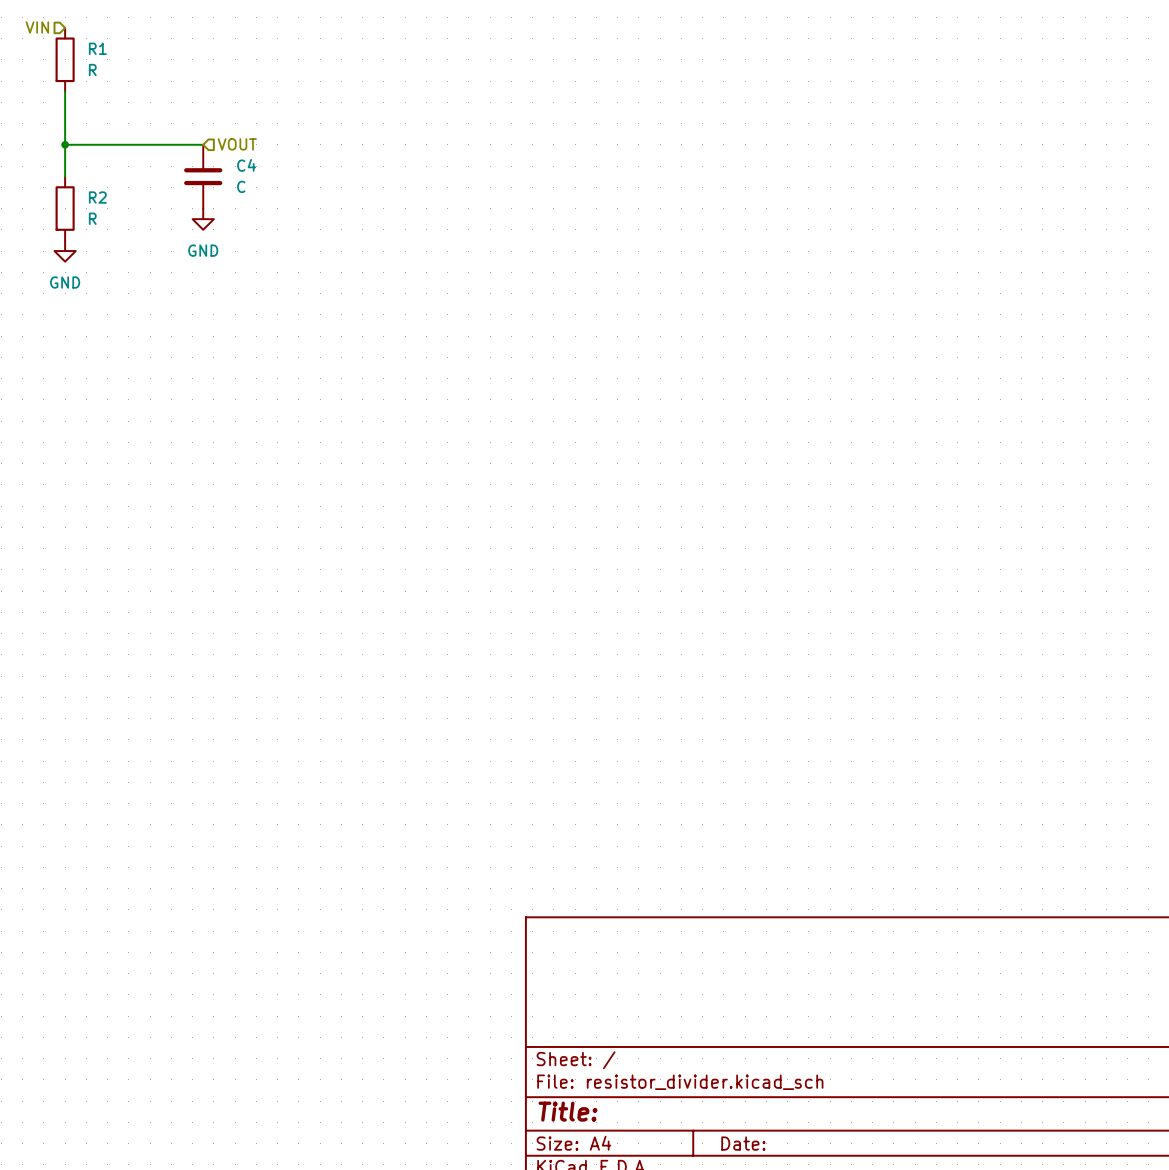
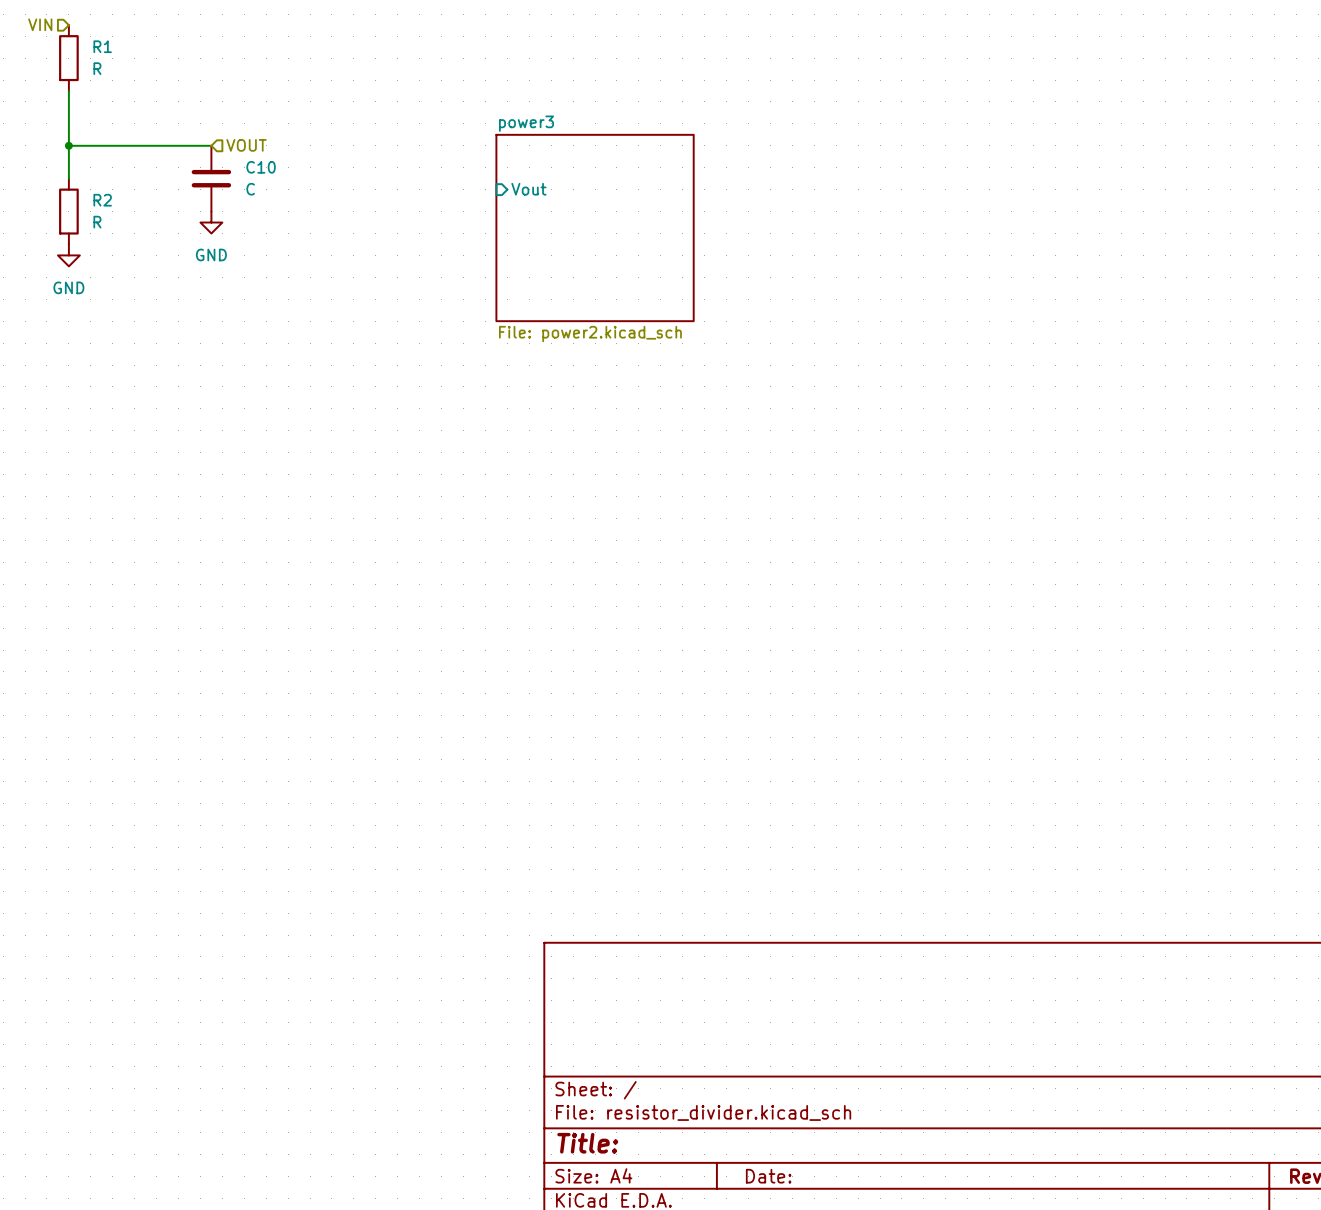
C4 name: C4 (246, 165) -> C10 (261, 167)
sheet pin: none -> Vout (528, 189)
sheet power3: none -> File: power2.kicad_sch (595, 228)

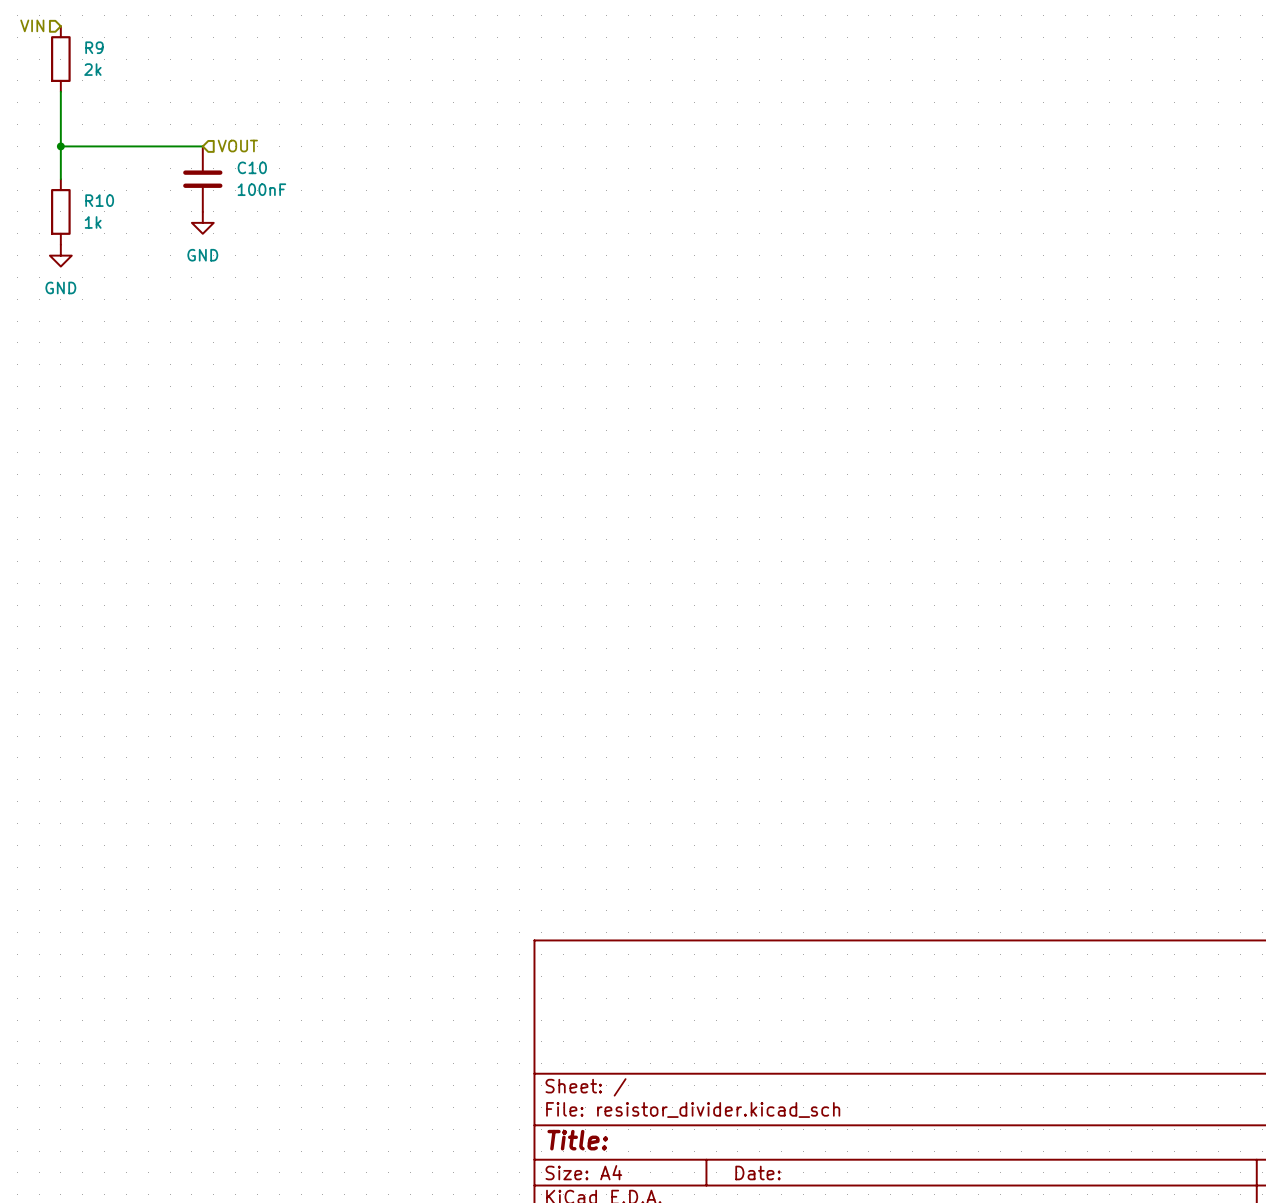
R1 name: R1 (102, 46) -> R9 (94, 47)
R1 value: R (97, 68) -> 2k (92, 69)
C10 value: C (250, 189) -> 100nF (261, 189)
sheet pin: Vout (528, 189) -> none
R2 name: R2 (102, 200) -> R10 (99, 200)
R2 value: R (97, 222) -> 1k (93, 222)
sheet power3: File: power2.kicad_sch (595, 228) -> none

